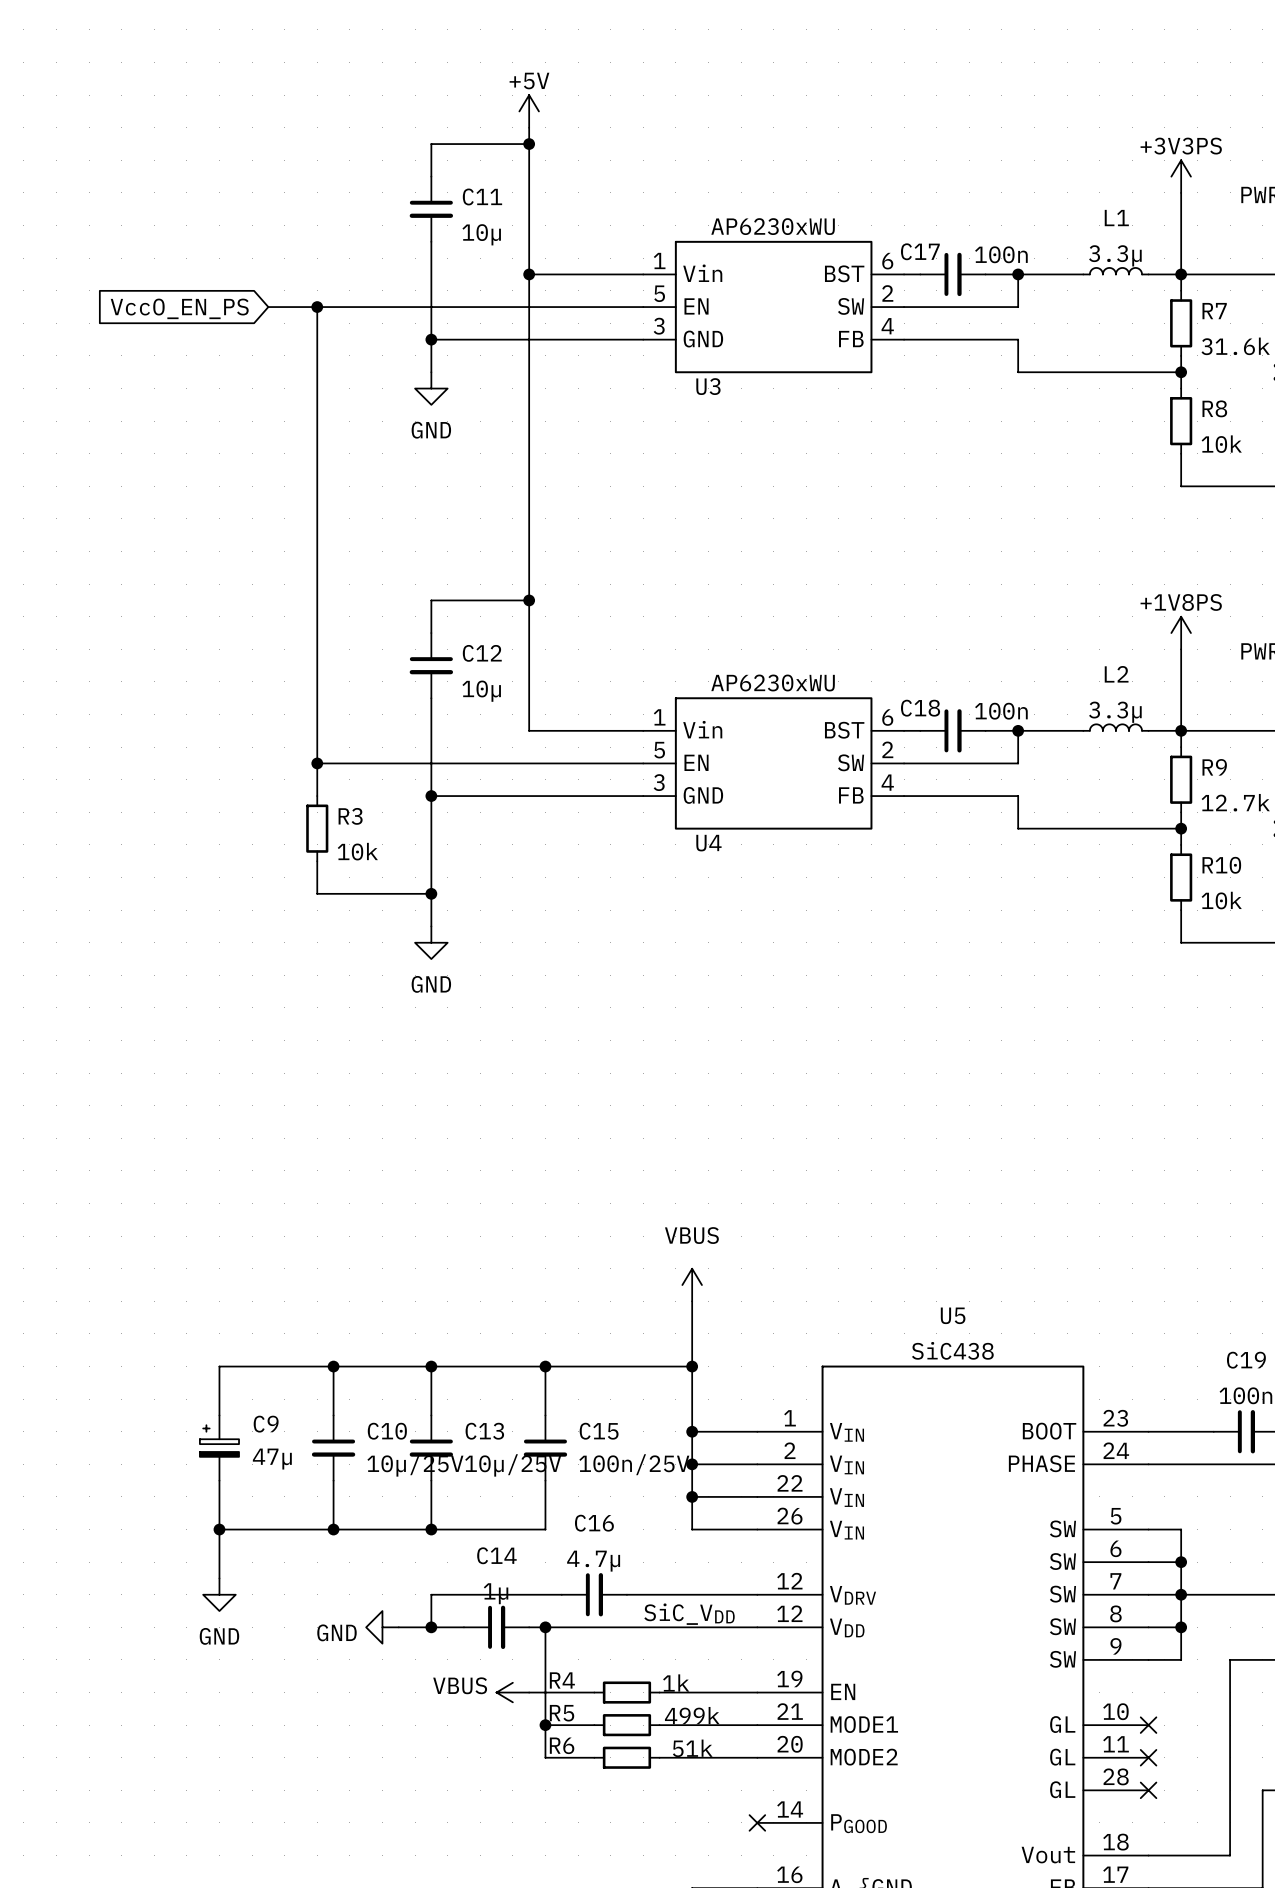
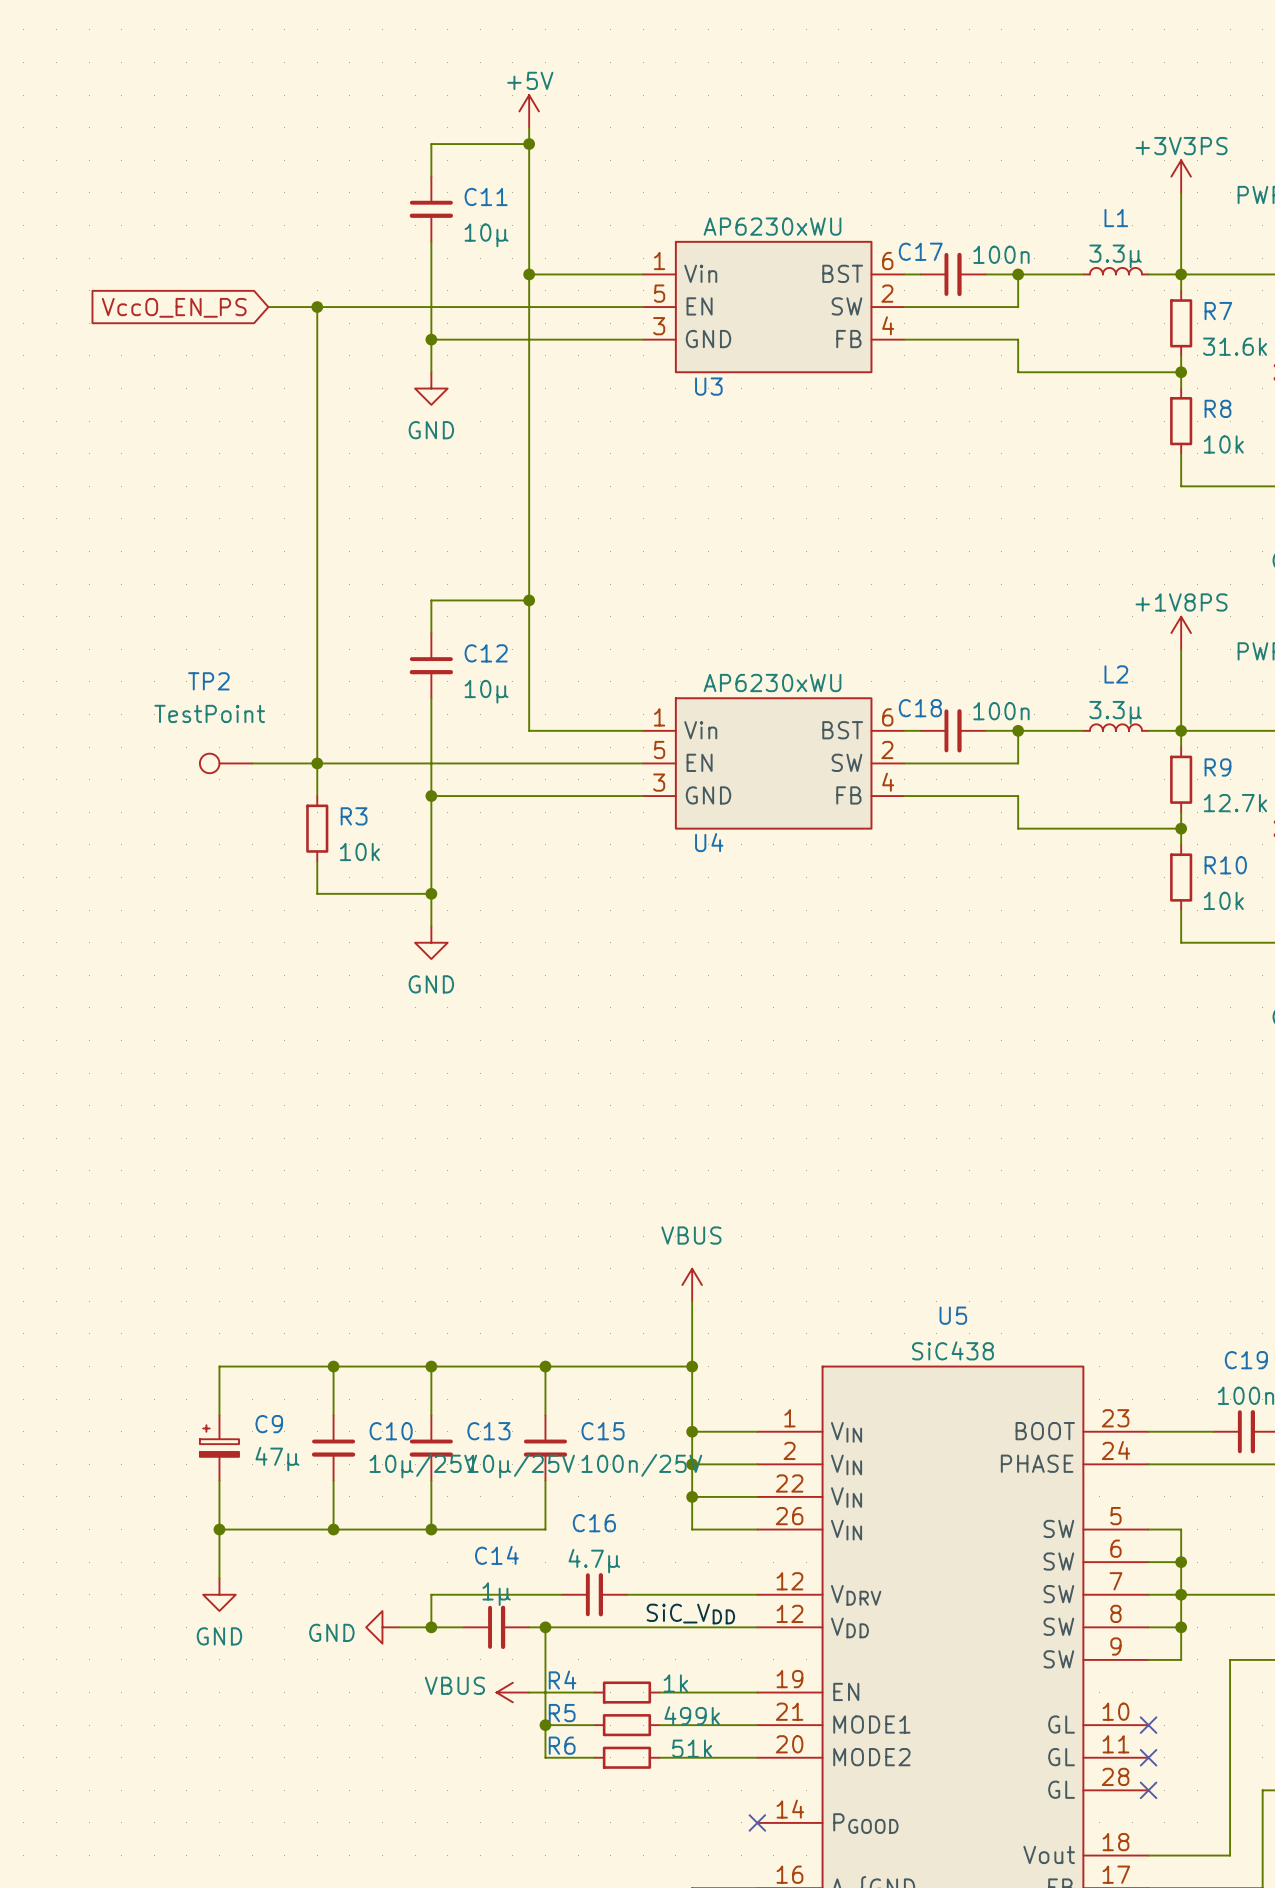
TP2: none -> TestPoint (225, 763)
wire: none -> (252, 763) (317, 763)

